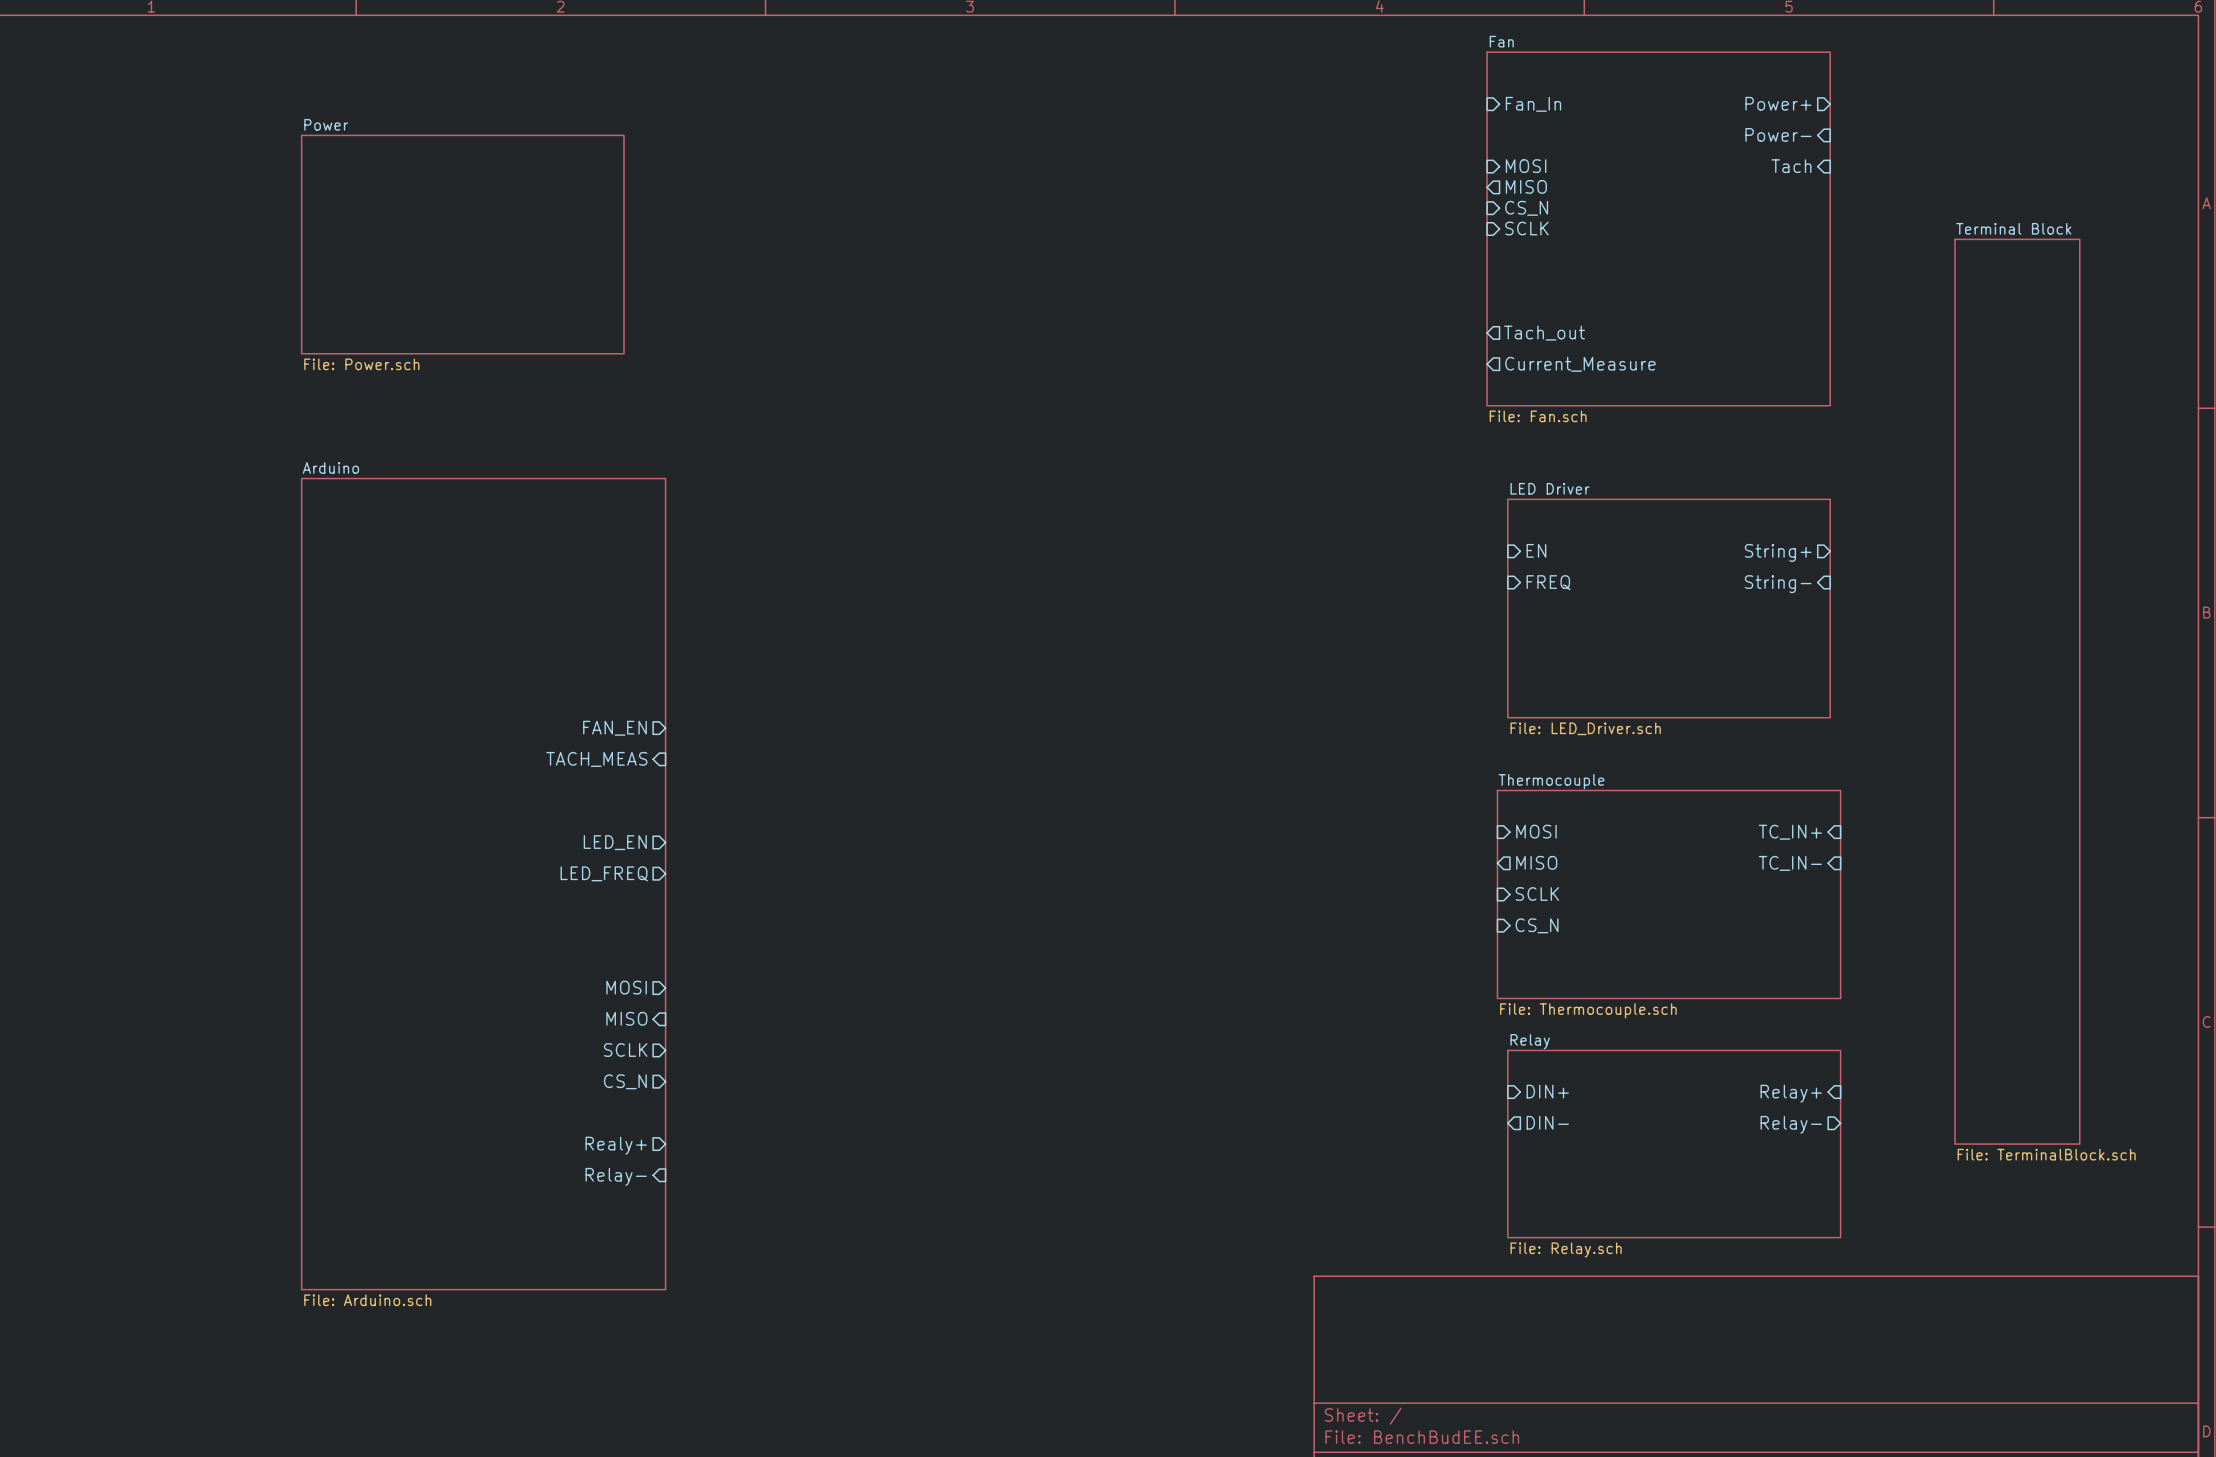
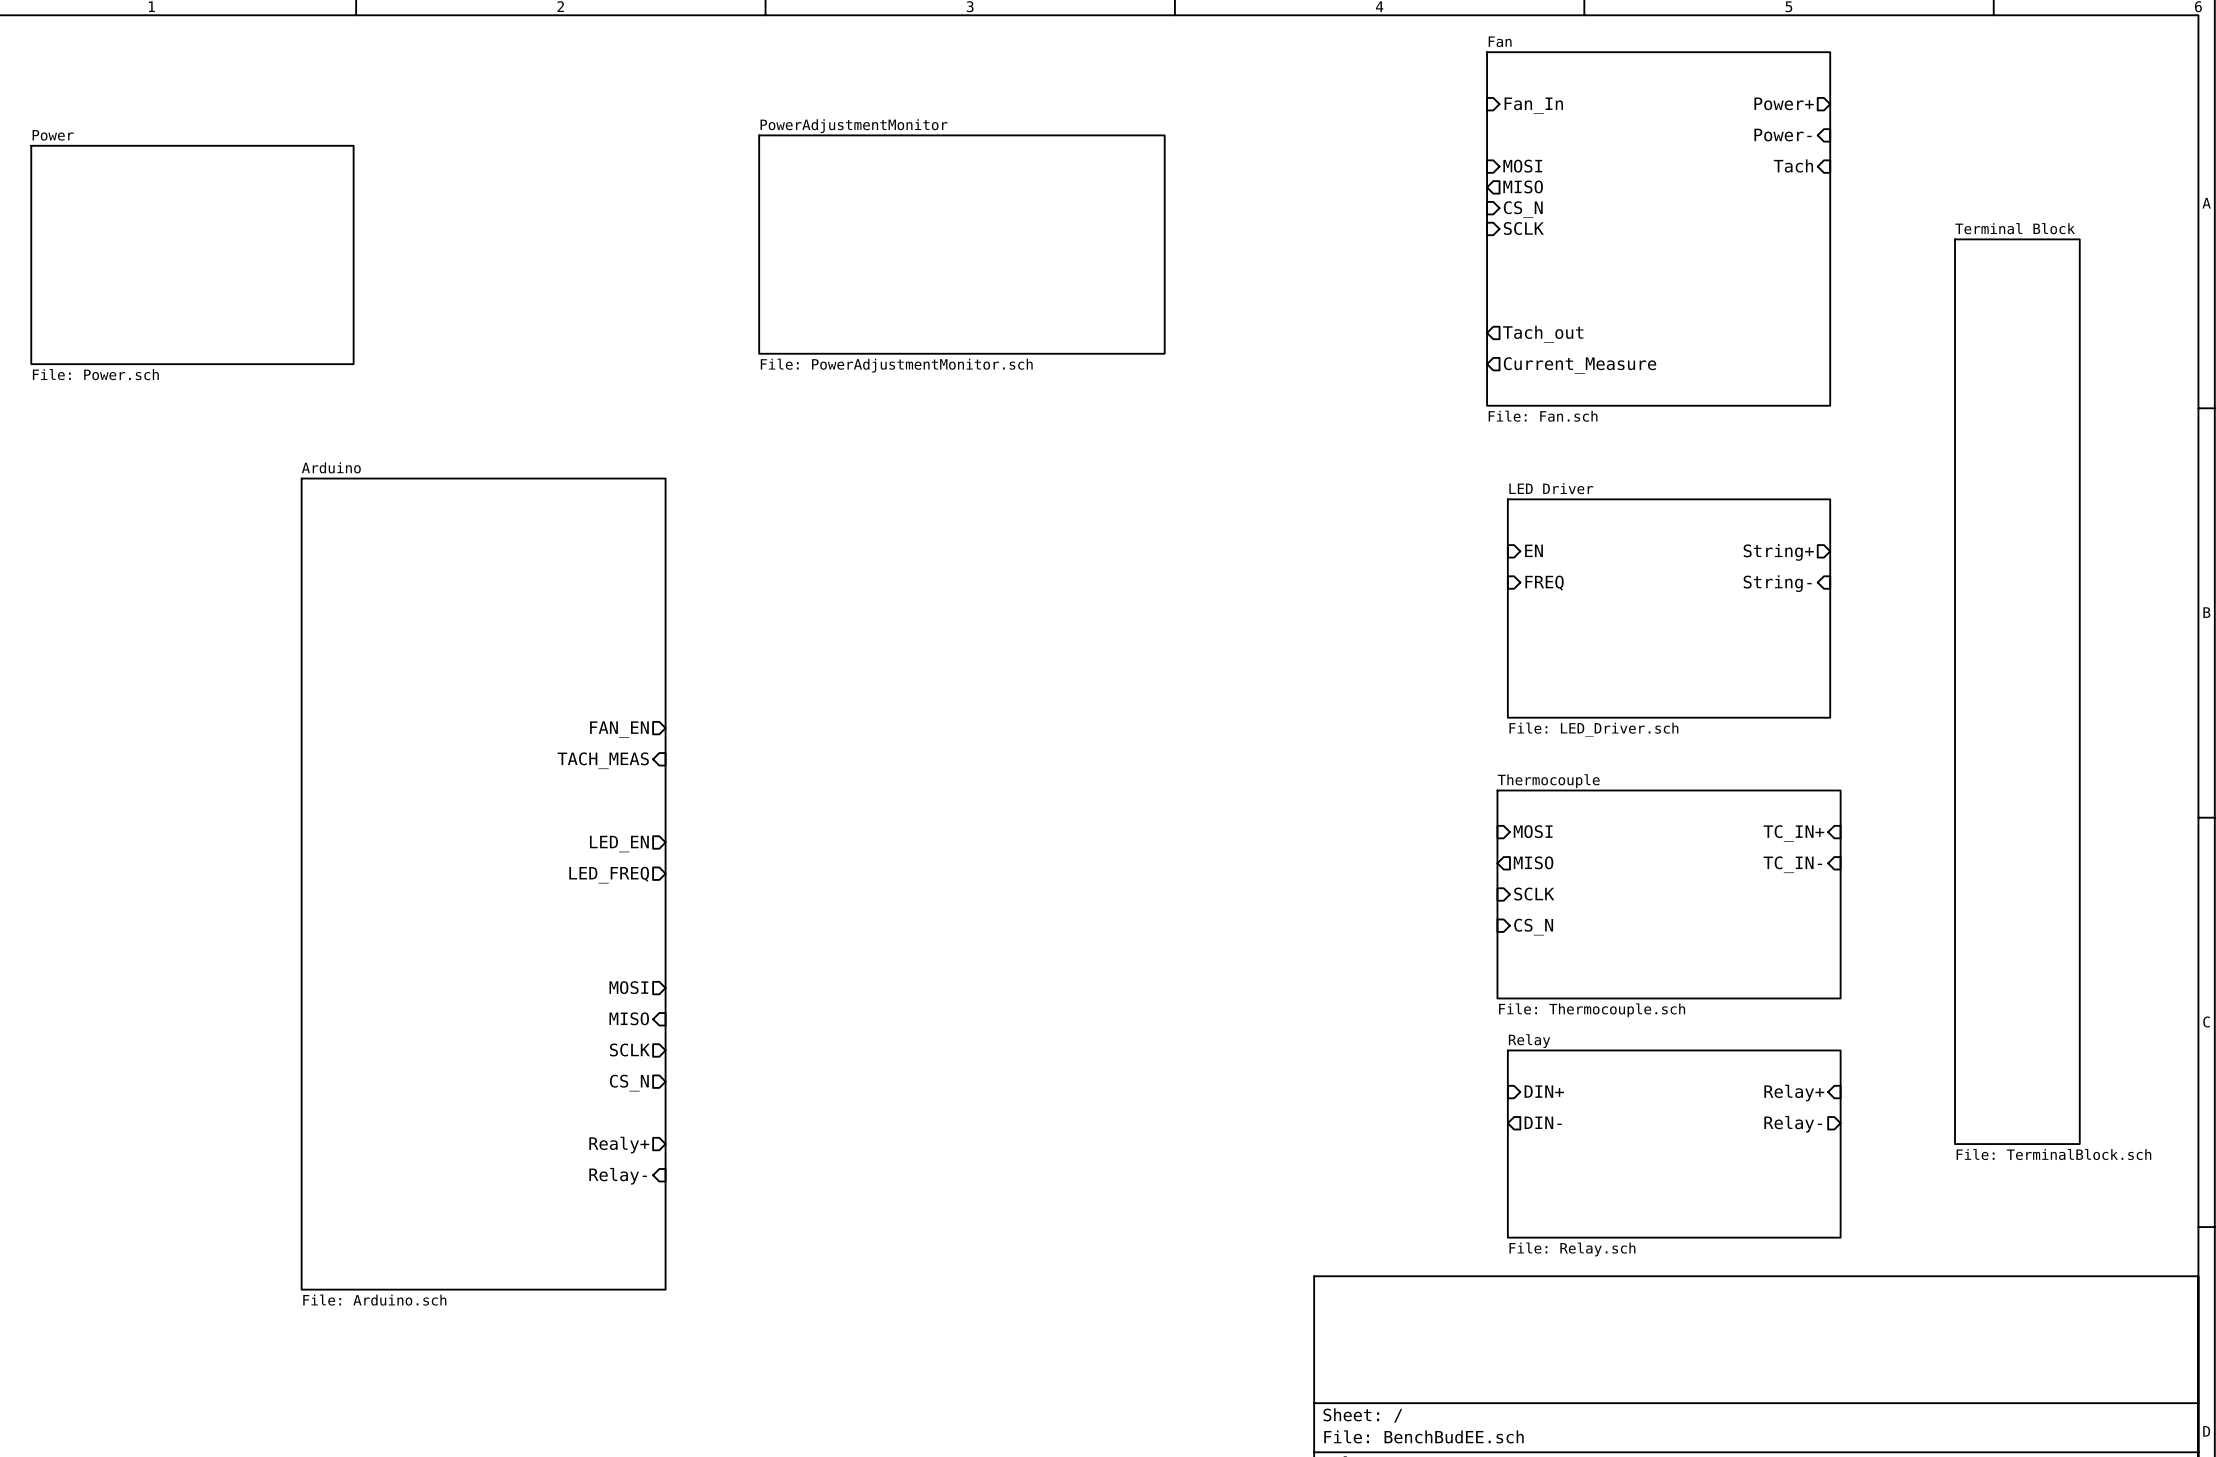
sheet Power: File: Power.sch (462, 244) -> none
sheet PowerAdjustmentMonitor: none -> File: PowerAdjustmentMonitor.sch (961, 244)
sheet Power: none -> File: Power.sch (192, 254)

